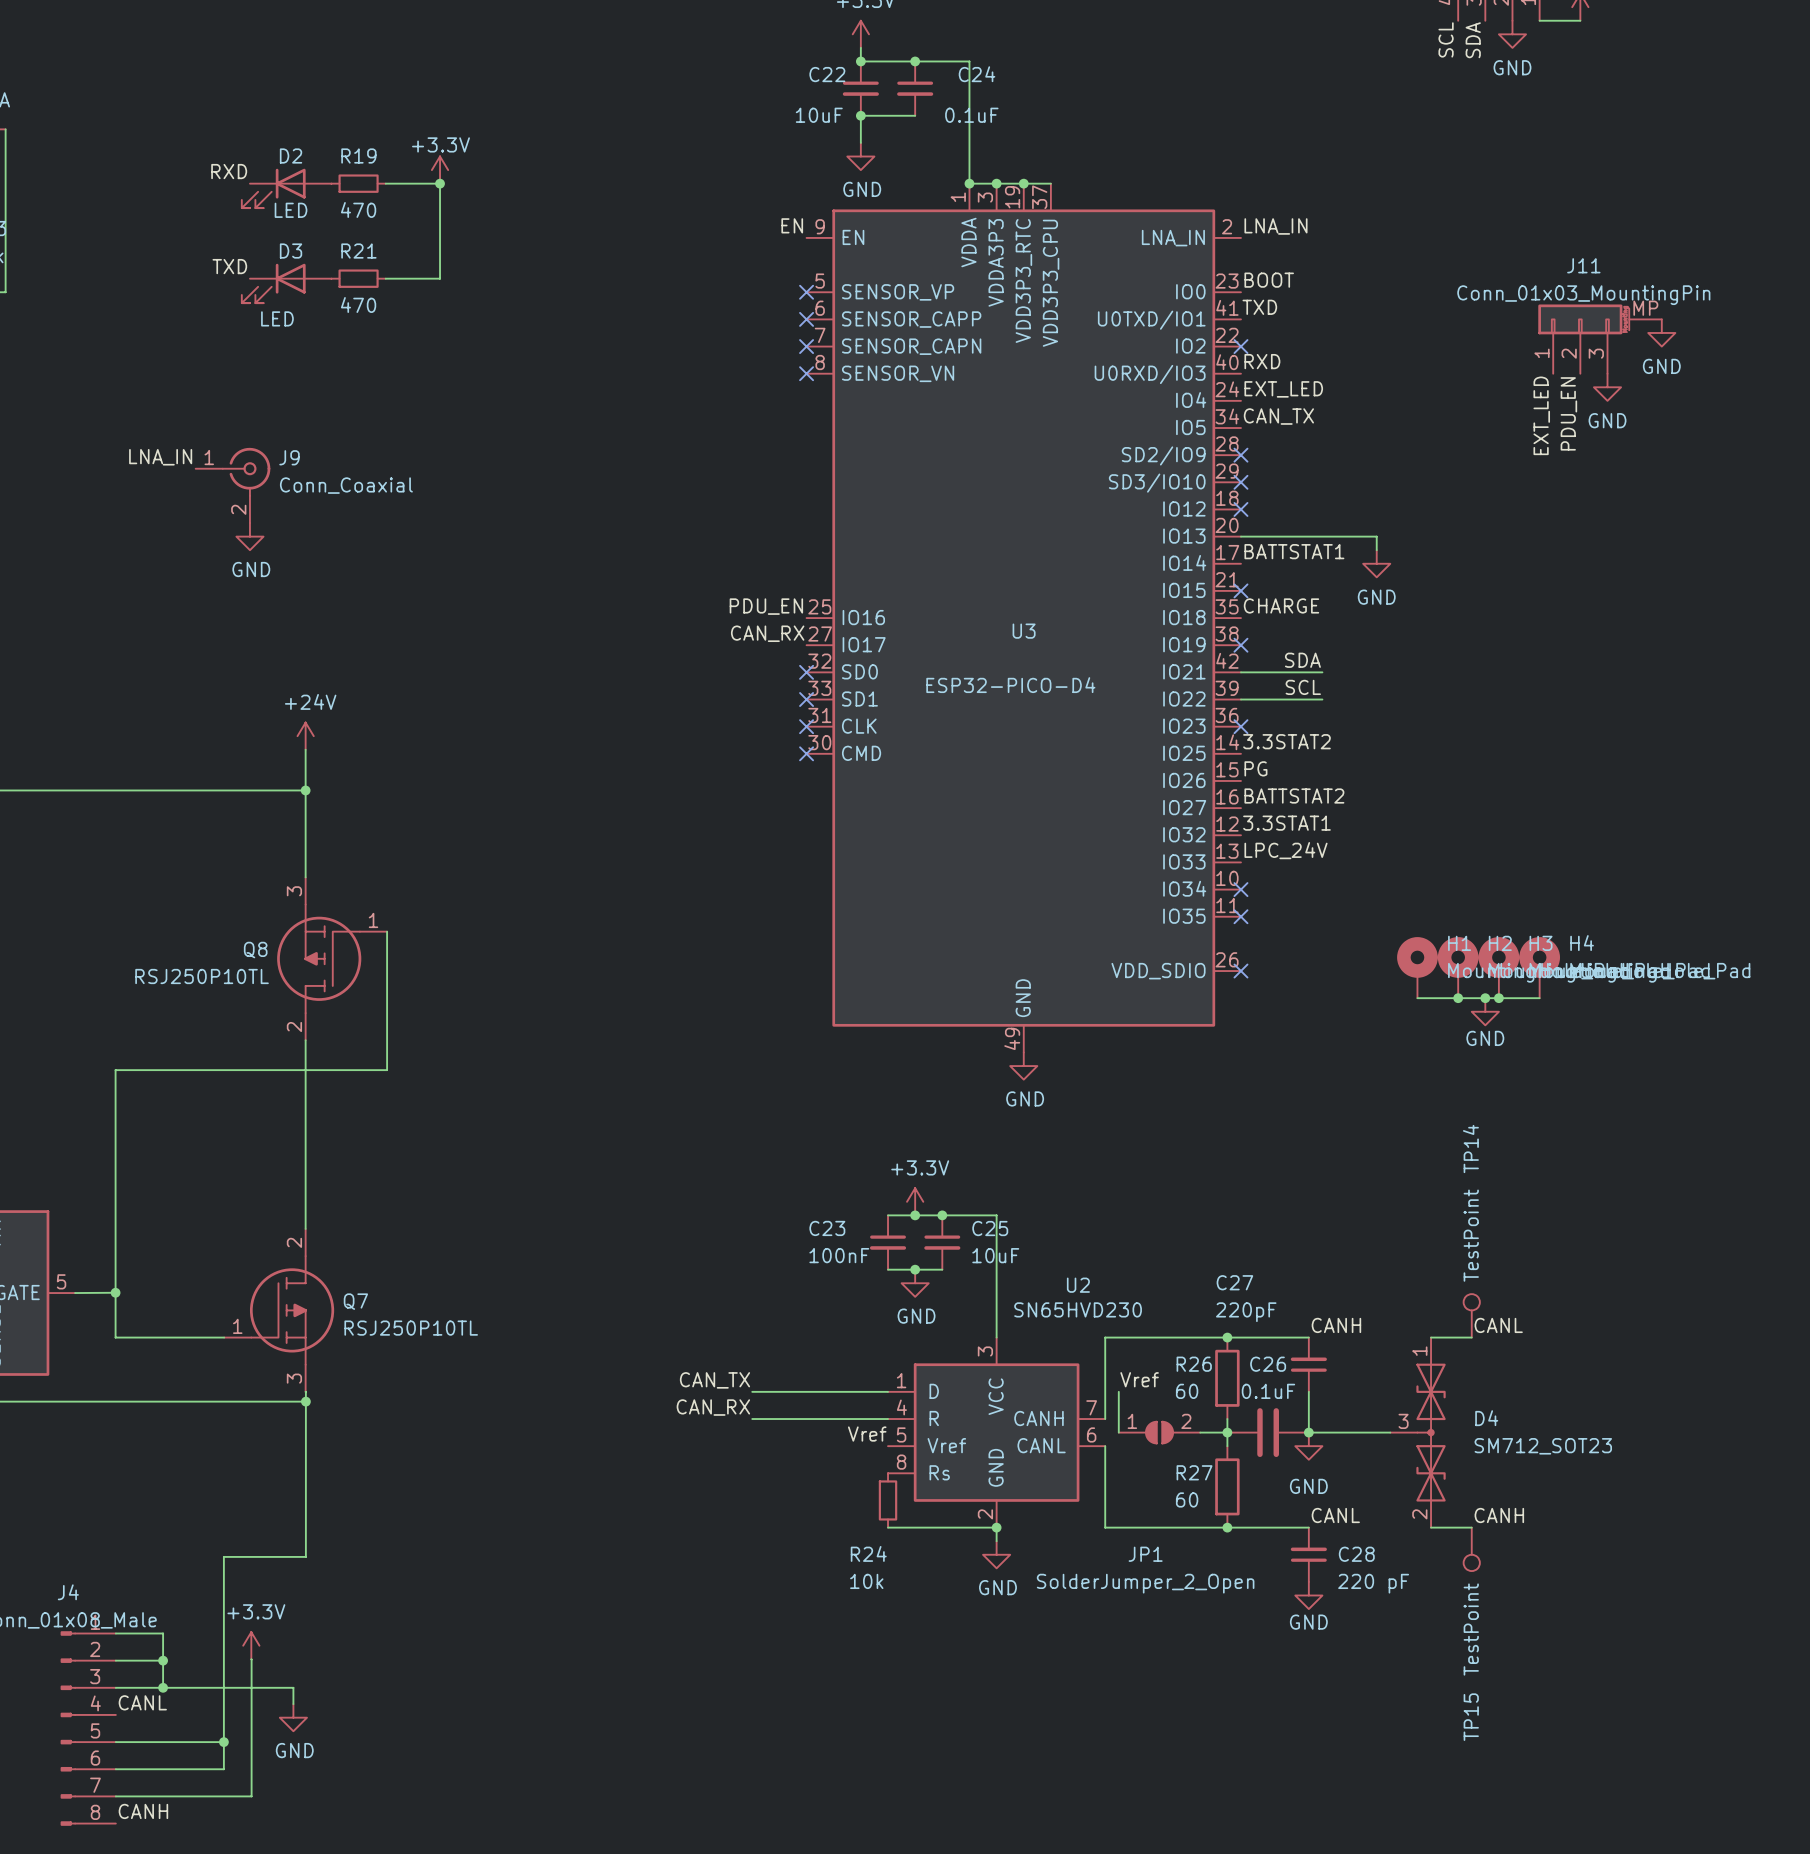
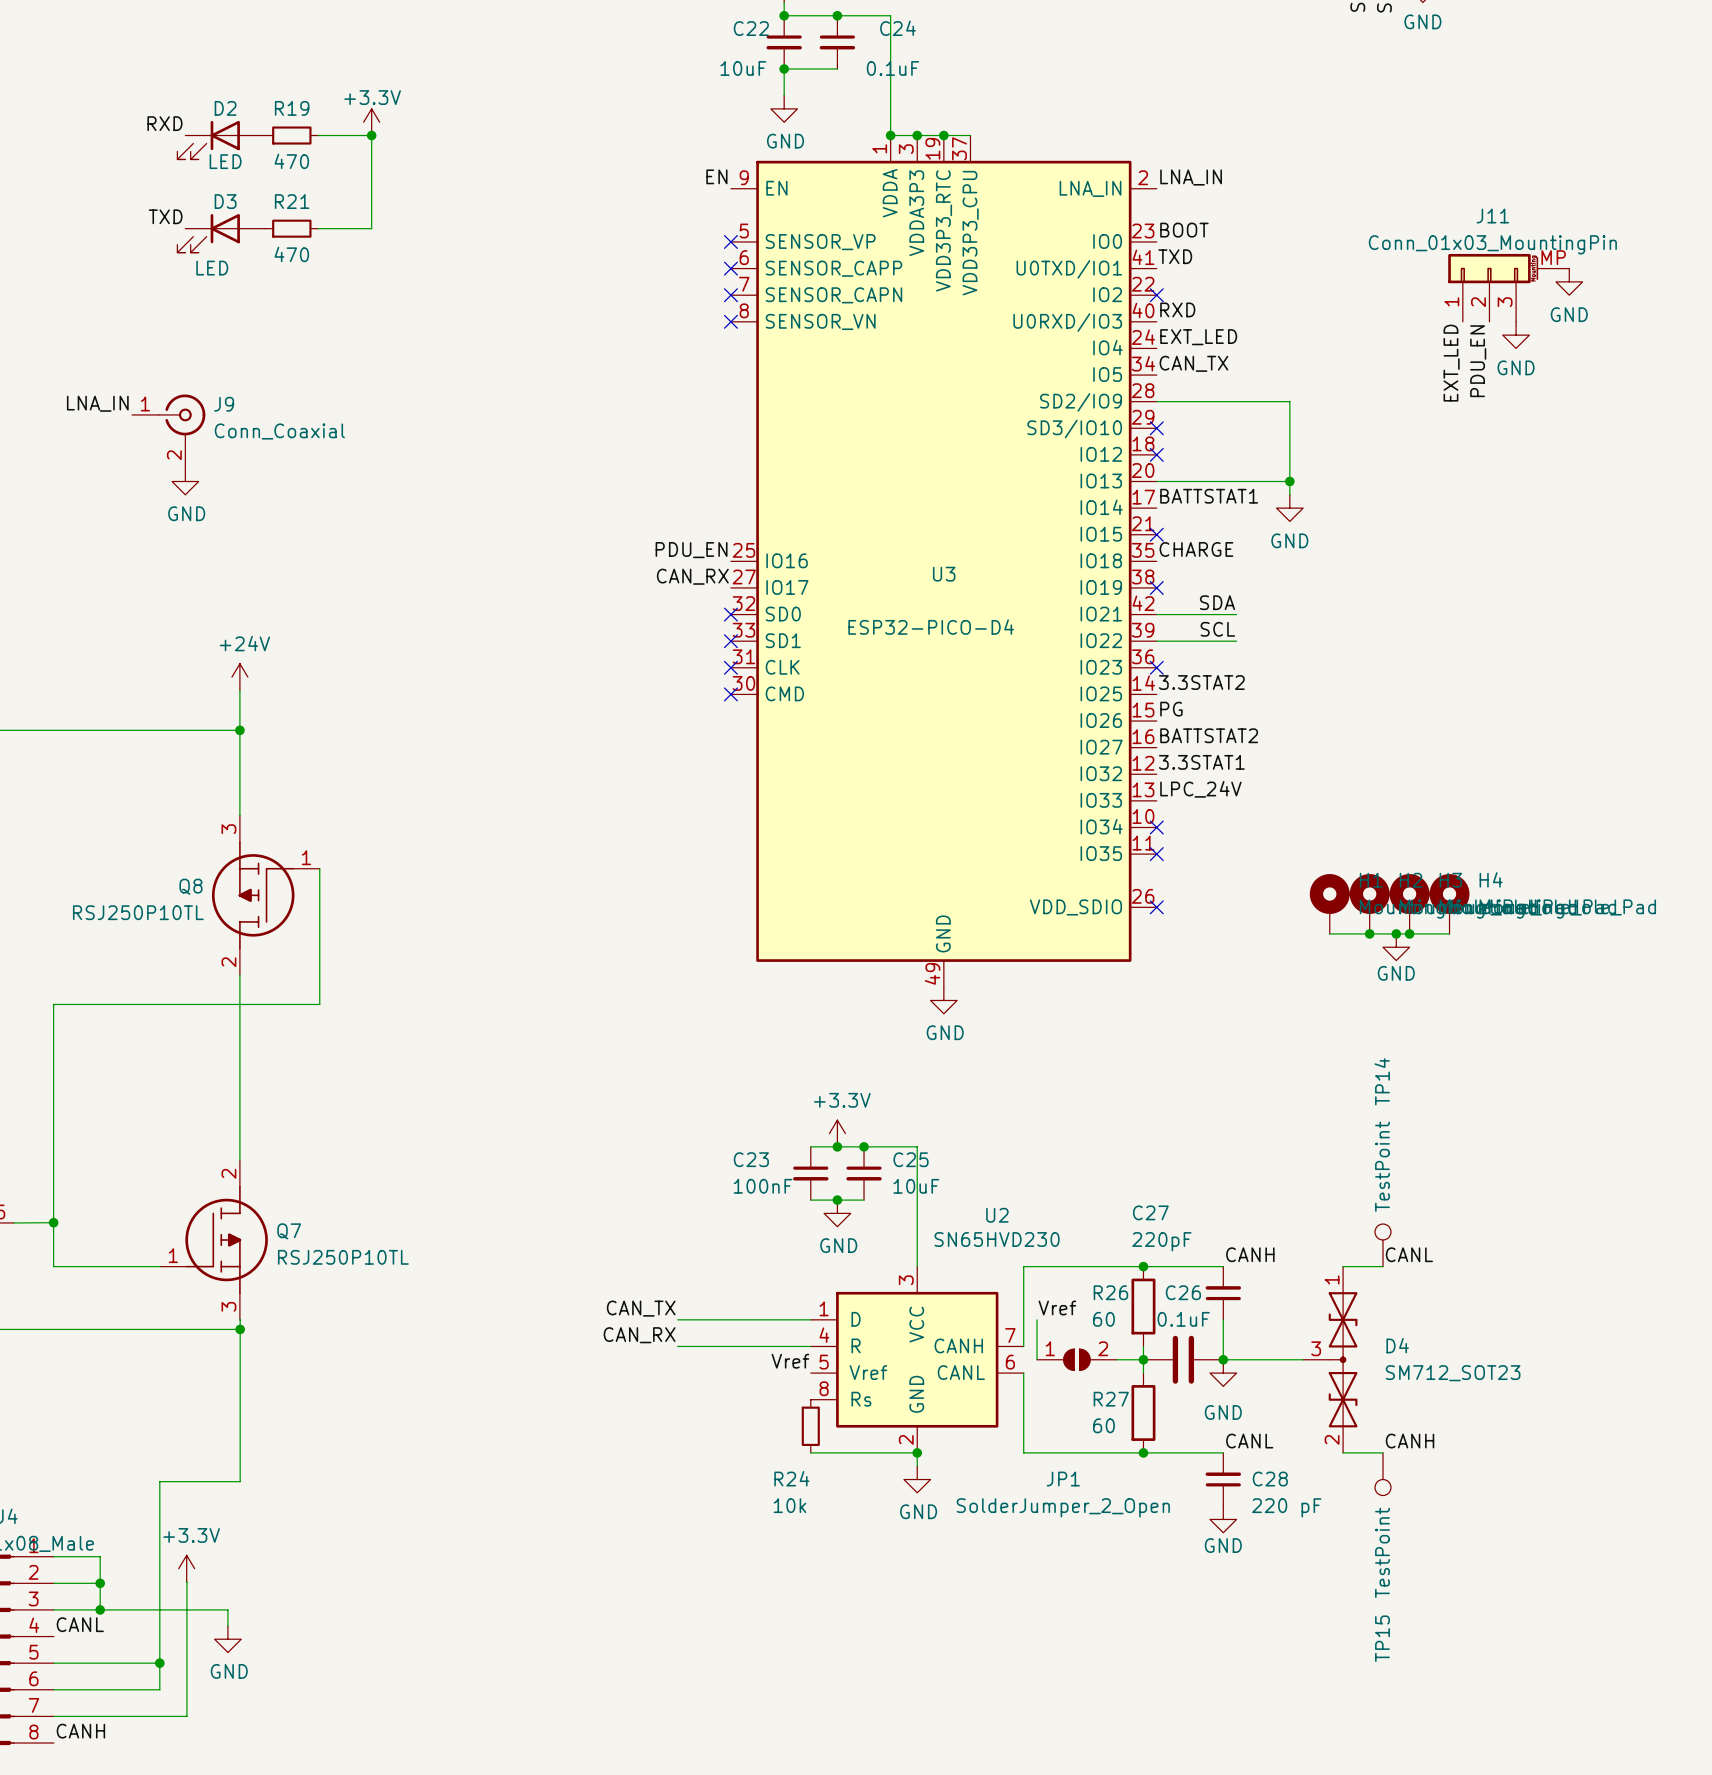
wire: none -> (1156, 401) (1289, 401) (1289, 481)
no-connect mark: (1240, 455) -> none
junction: none -> (1289, 481)

